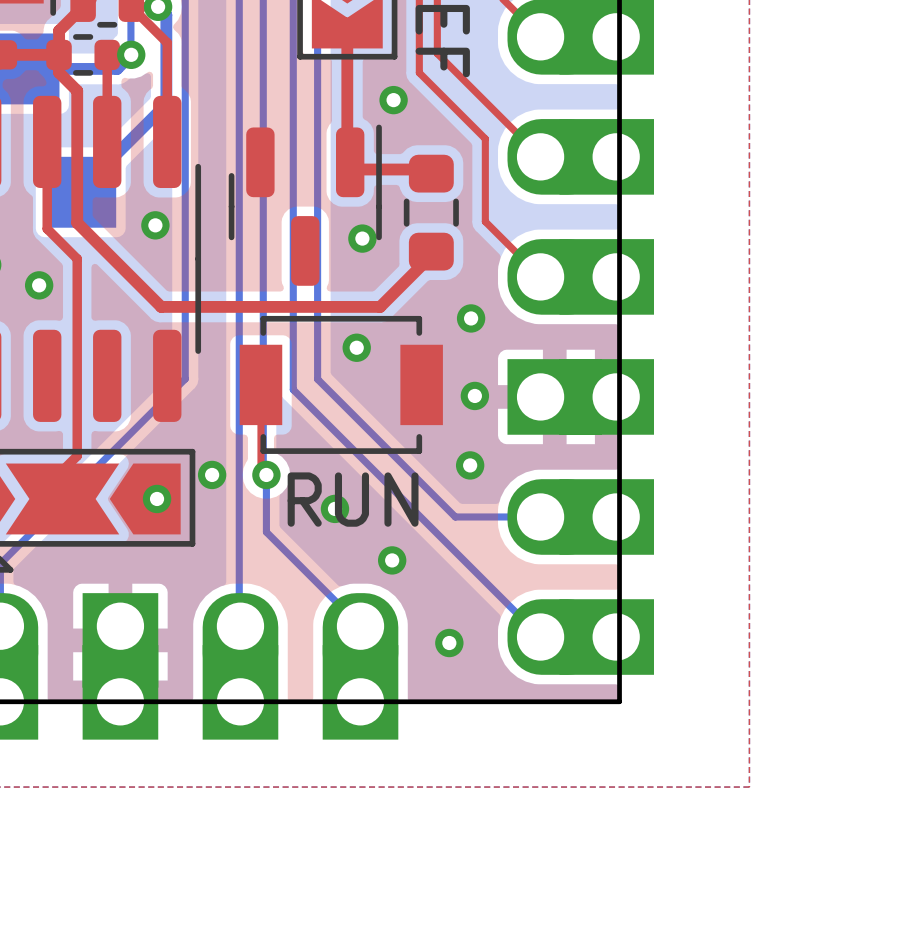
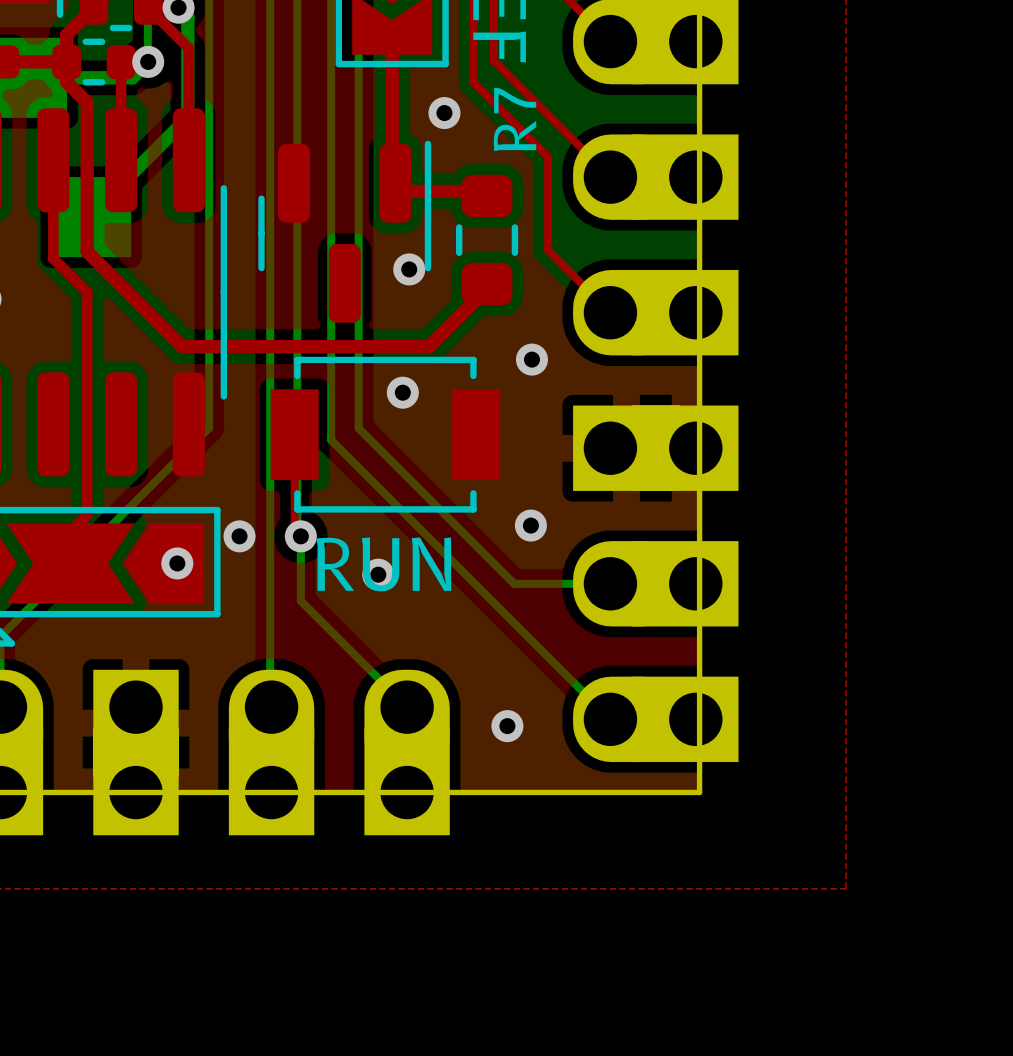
R7 name: none -> R7 (515, 119)
via: (155, 225) -> none
via: (39, 285) -> none
via: (474, 395) -> none
via: (392, 560) -> none

